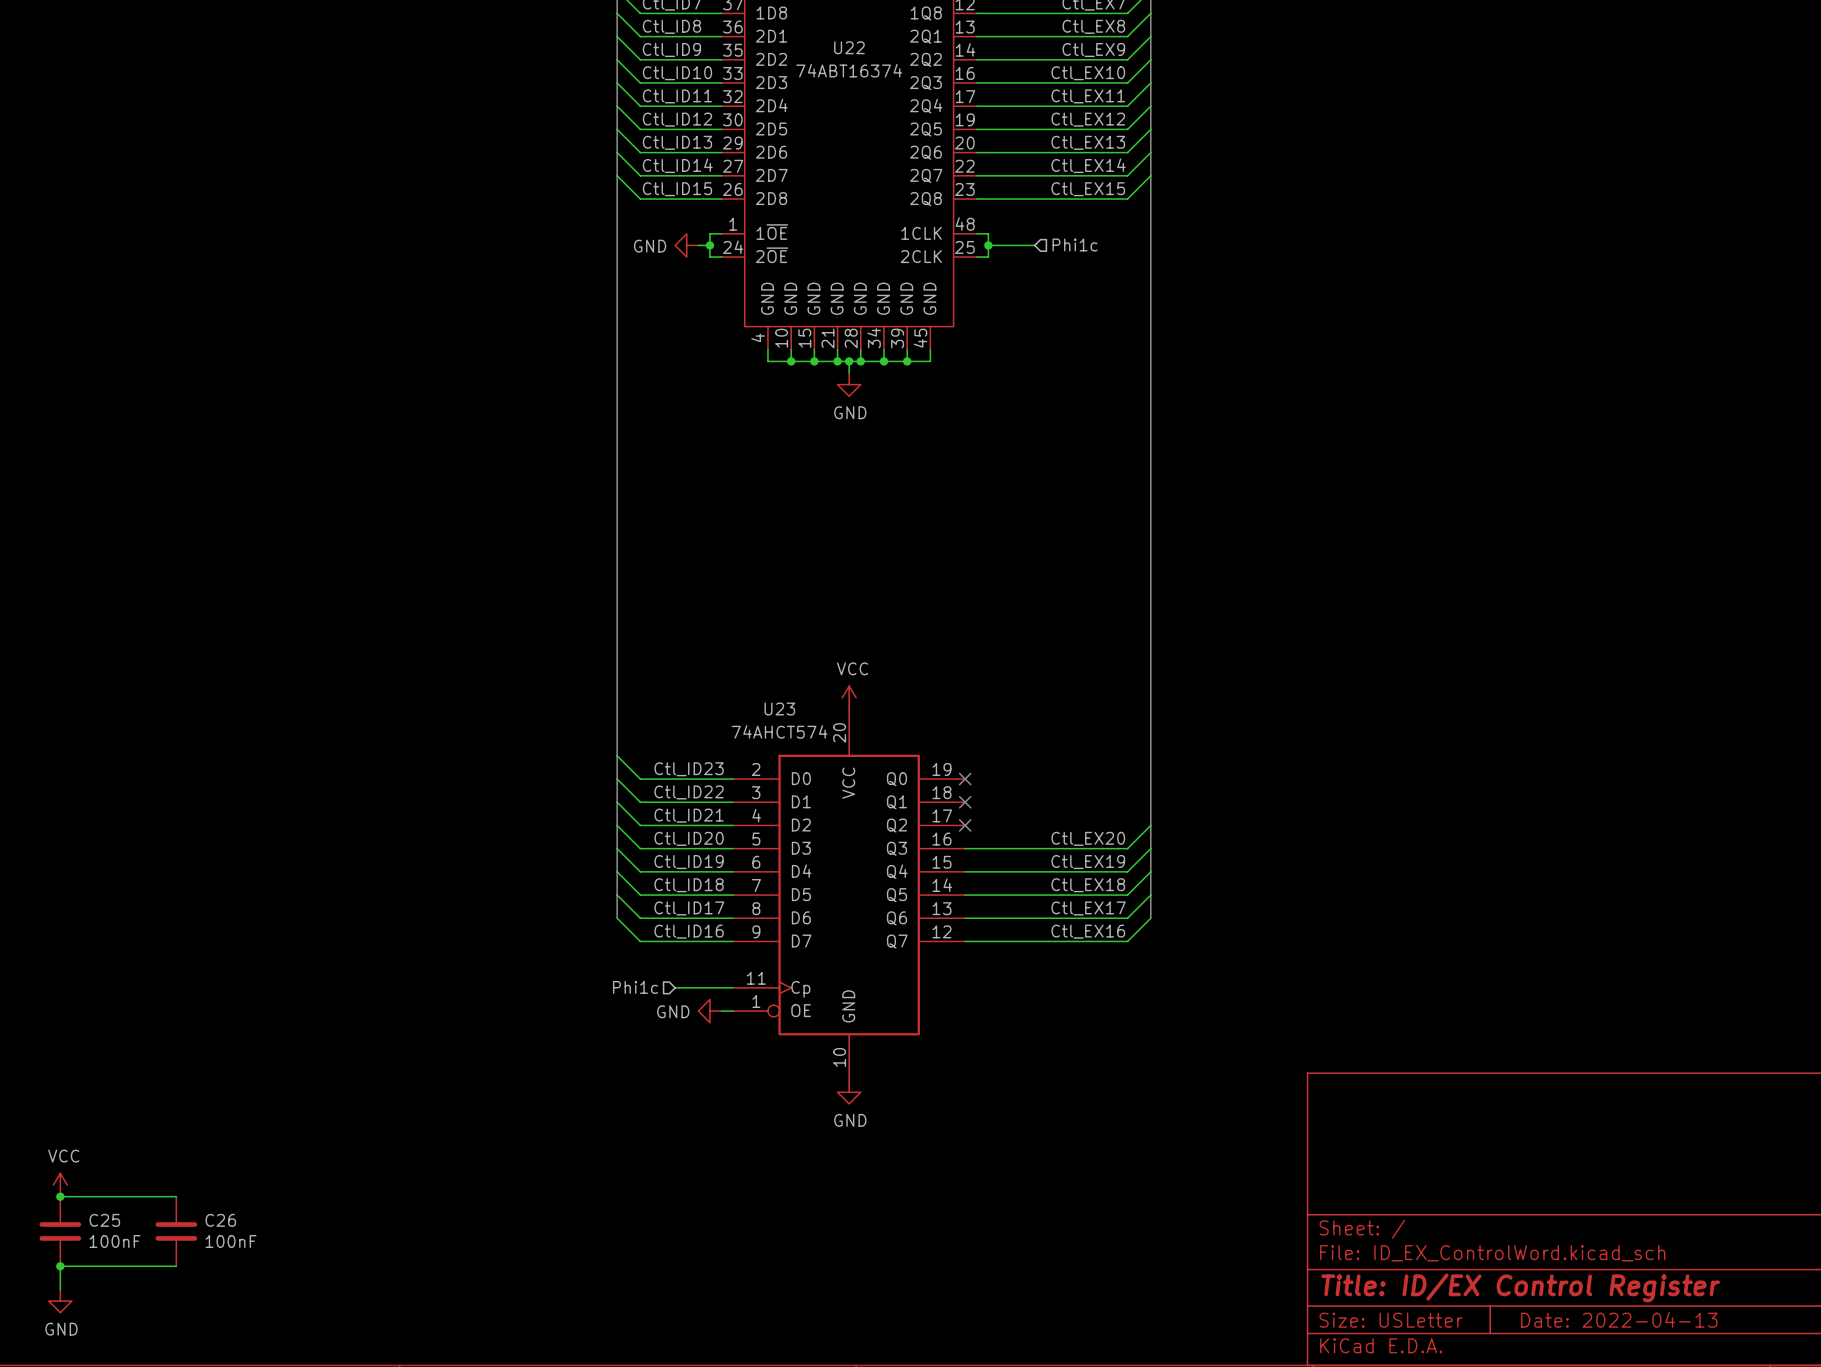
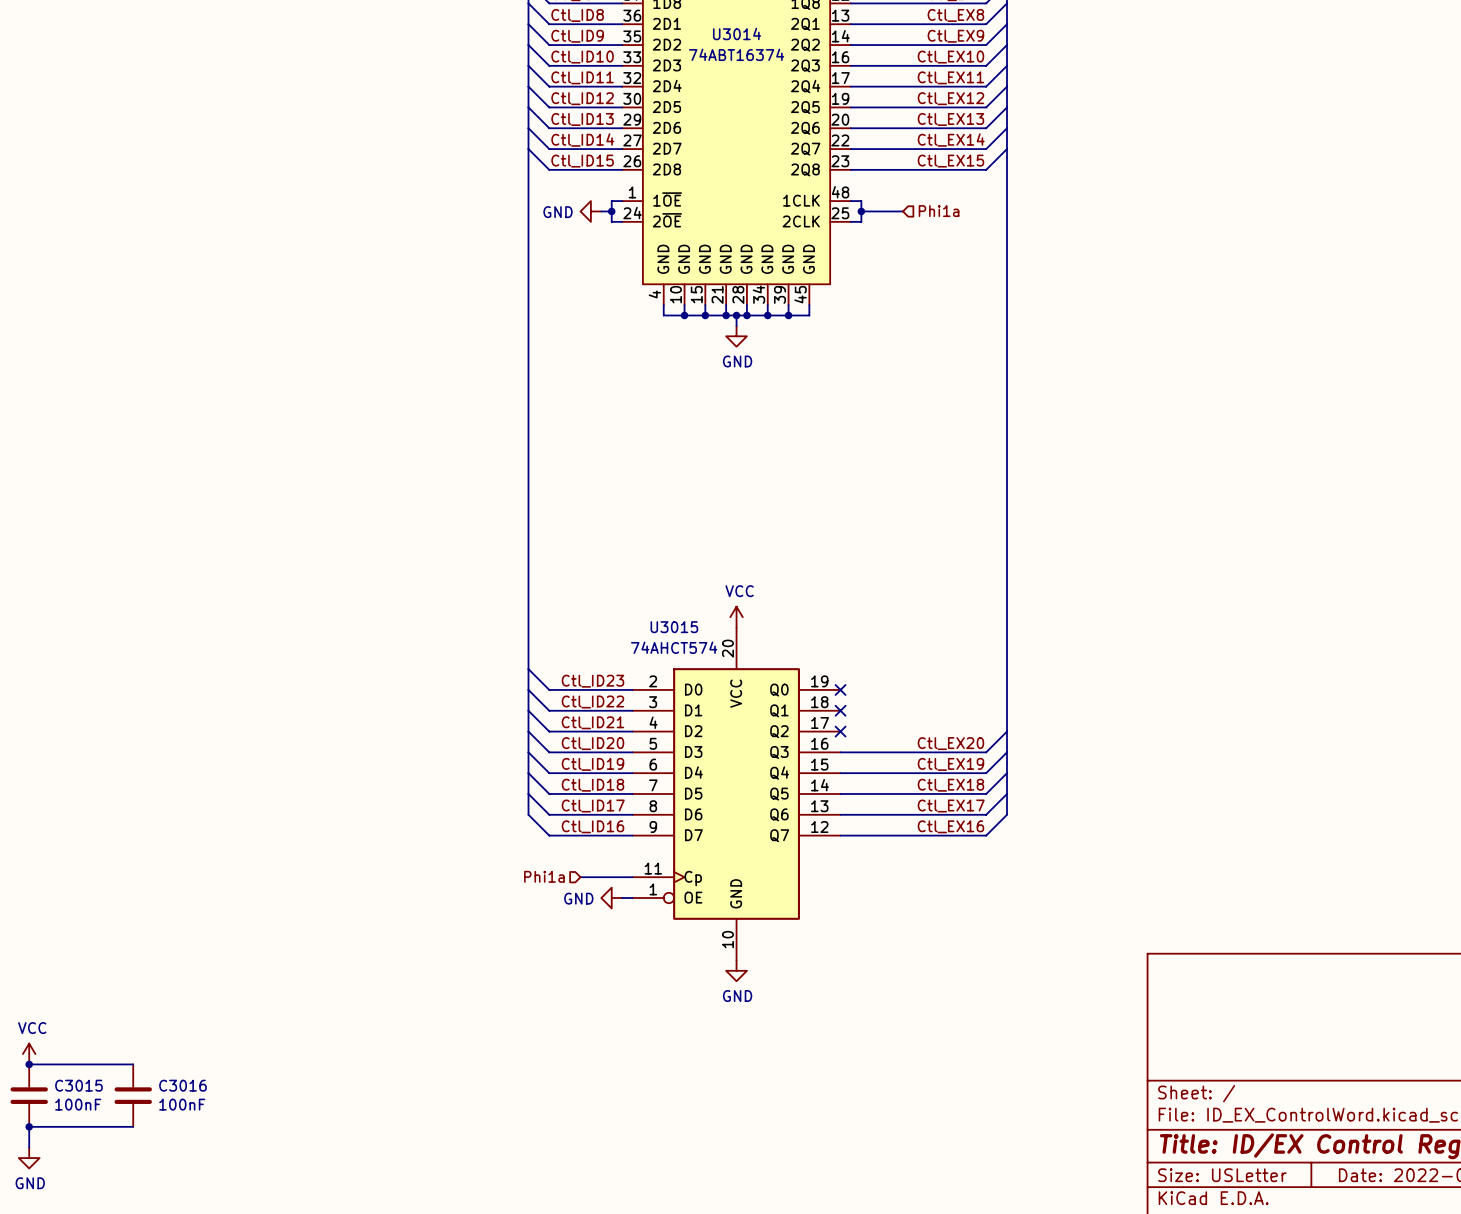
U22 name: U22 (849, 47) -> U3014 (737, 33)
hierarchical label: Phi1c (1075, 244) -> Phi1a (939, 211)
U23 name: U23 (779, 709) -> U3015 (674, 627)
hierarchical label: Phi1c (635, 987) -> Phi1a (544, 876)
C25 name: C25 (104, 1220) -> C3015 (78, 1085)
C26 name: C26 (220, 1220) -> C3016 (182, 1085)

